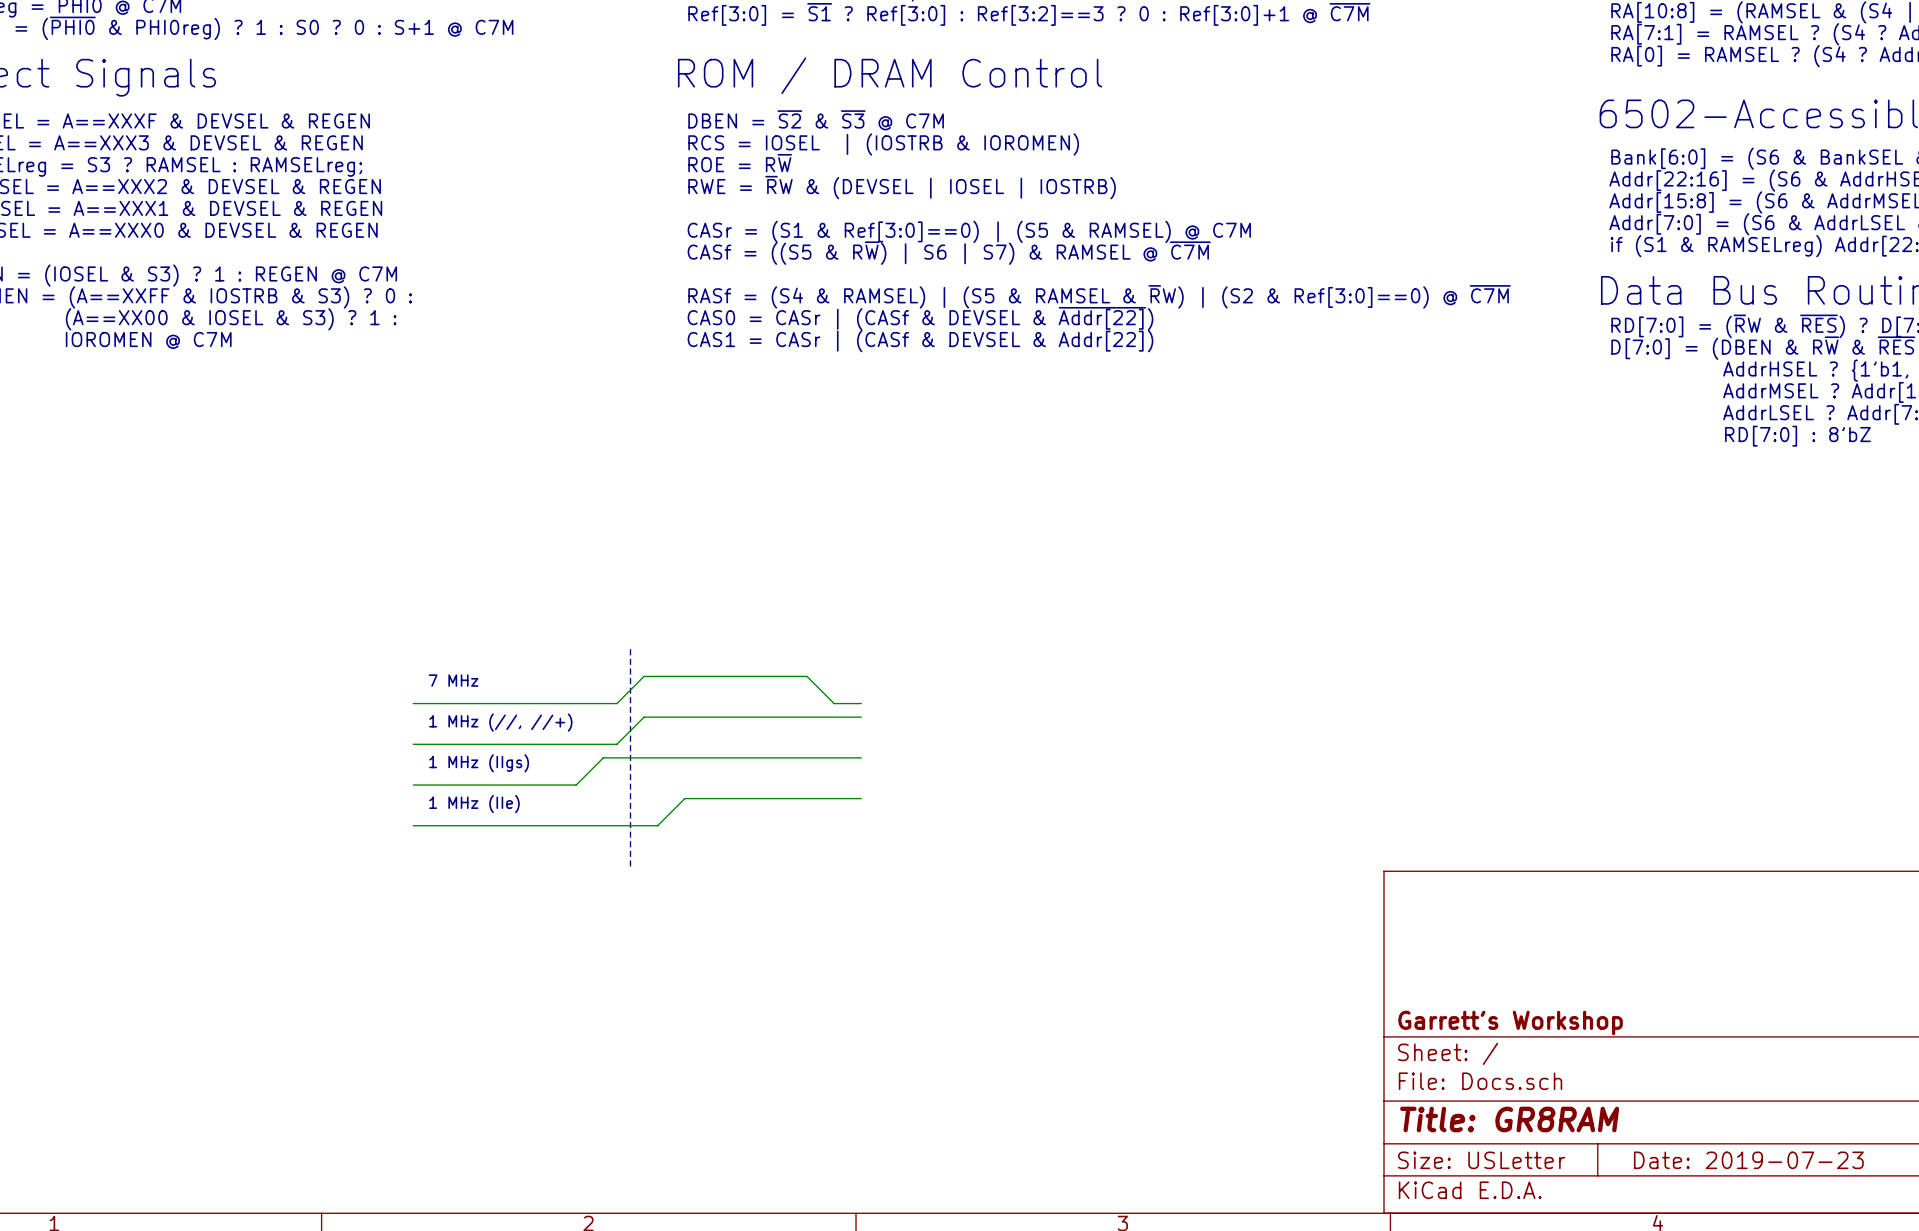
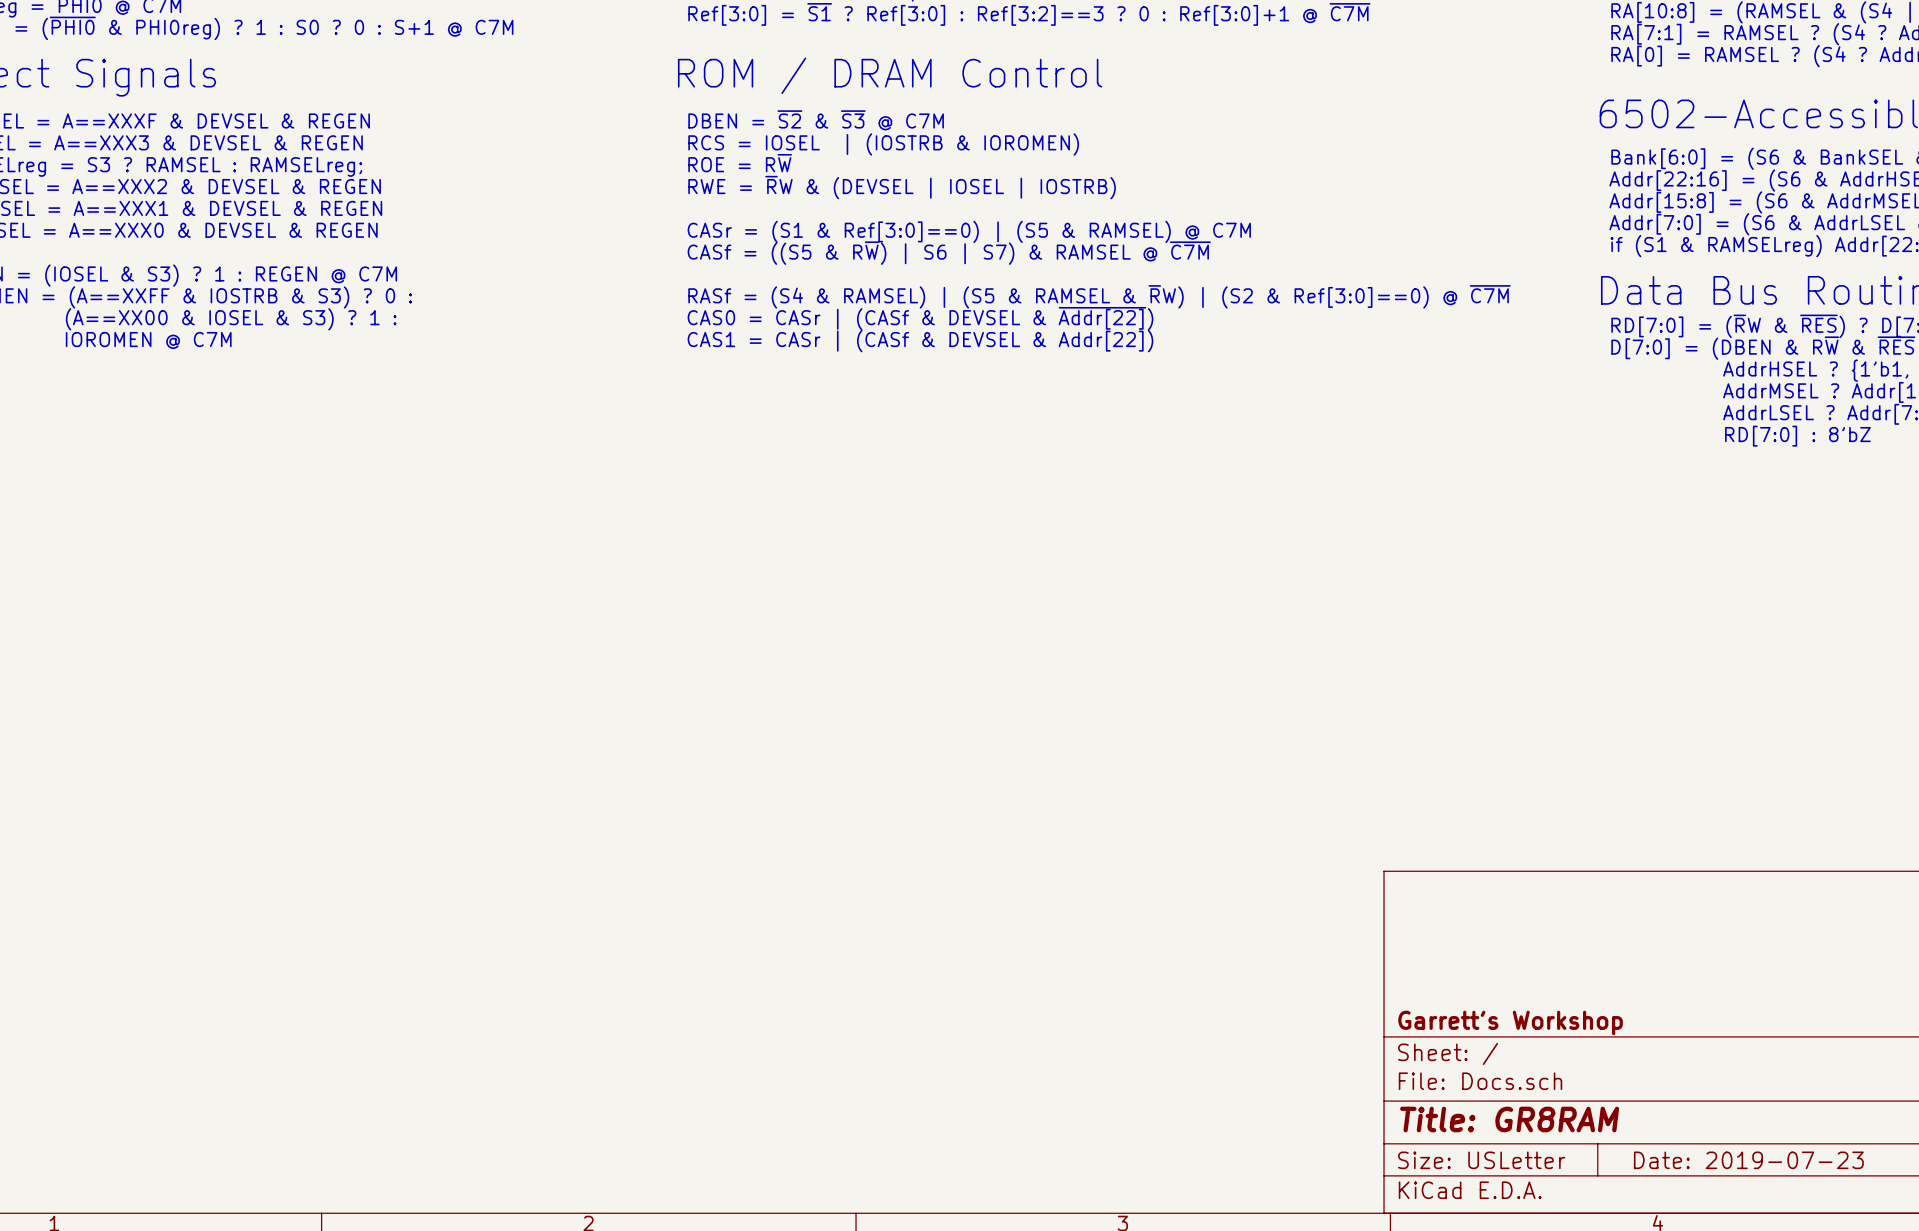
line: (630, 649) (630, 866) -> none
text: 7 MHz (453, 680) -> none
wire: (413, 703) (616, 703) (644, 676) (806, 676) (834, 703) (861, 703) -> none
wire: (861, 717) (644, 717) (616, 744) (413, 744) -> none
text: 1 MHz (//, //+) (500, 722) -> none
wire: (861, 757) (603, 757) (576, 785) (413, 785) -> none
text: 1 MHz (IIgs) (479, 763) -> none
wire: (861, 798) (684, 798) (657, 825) (413, 825) -> none
text: 1 MHz (IIe) (474, 804) -> none

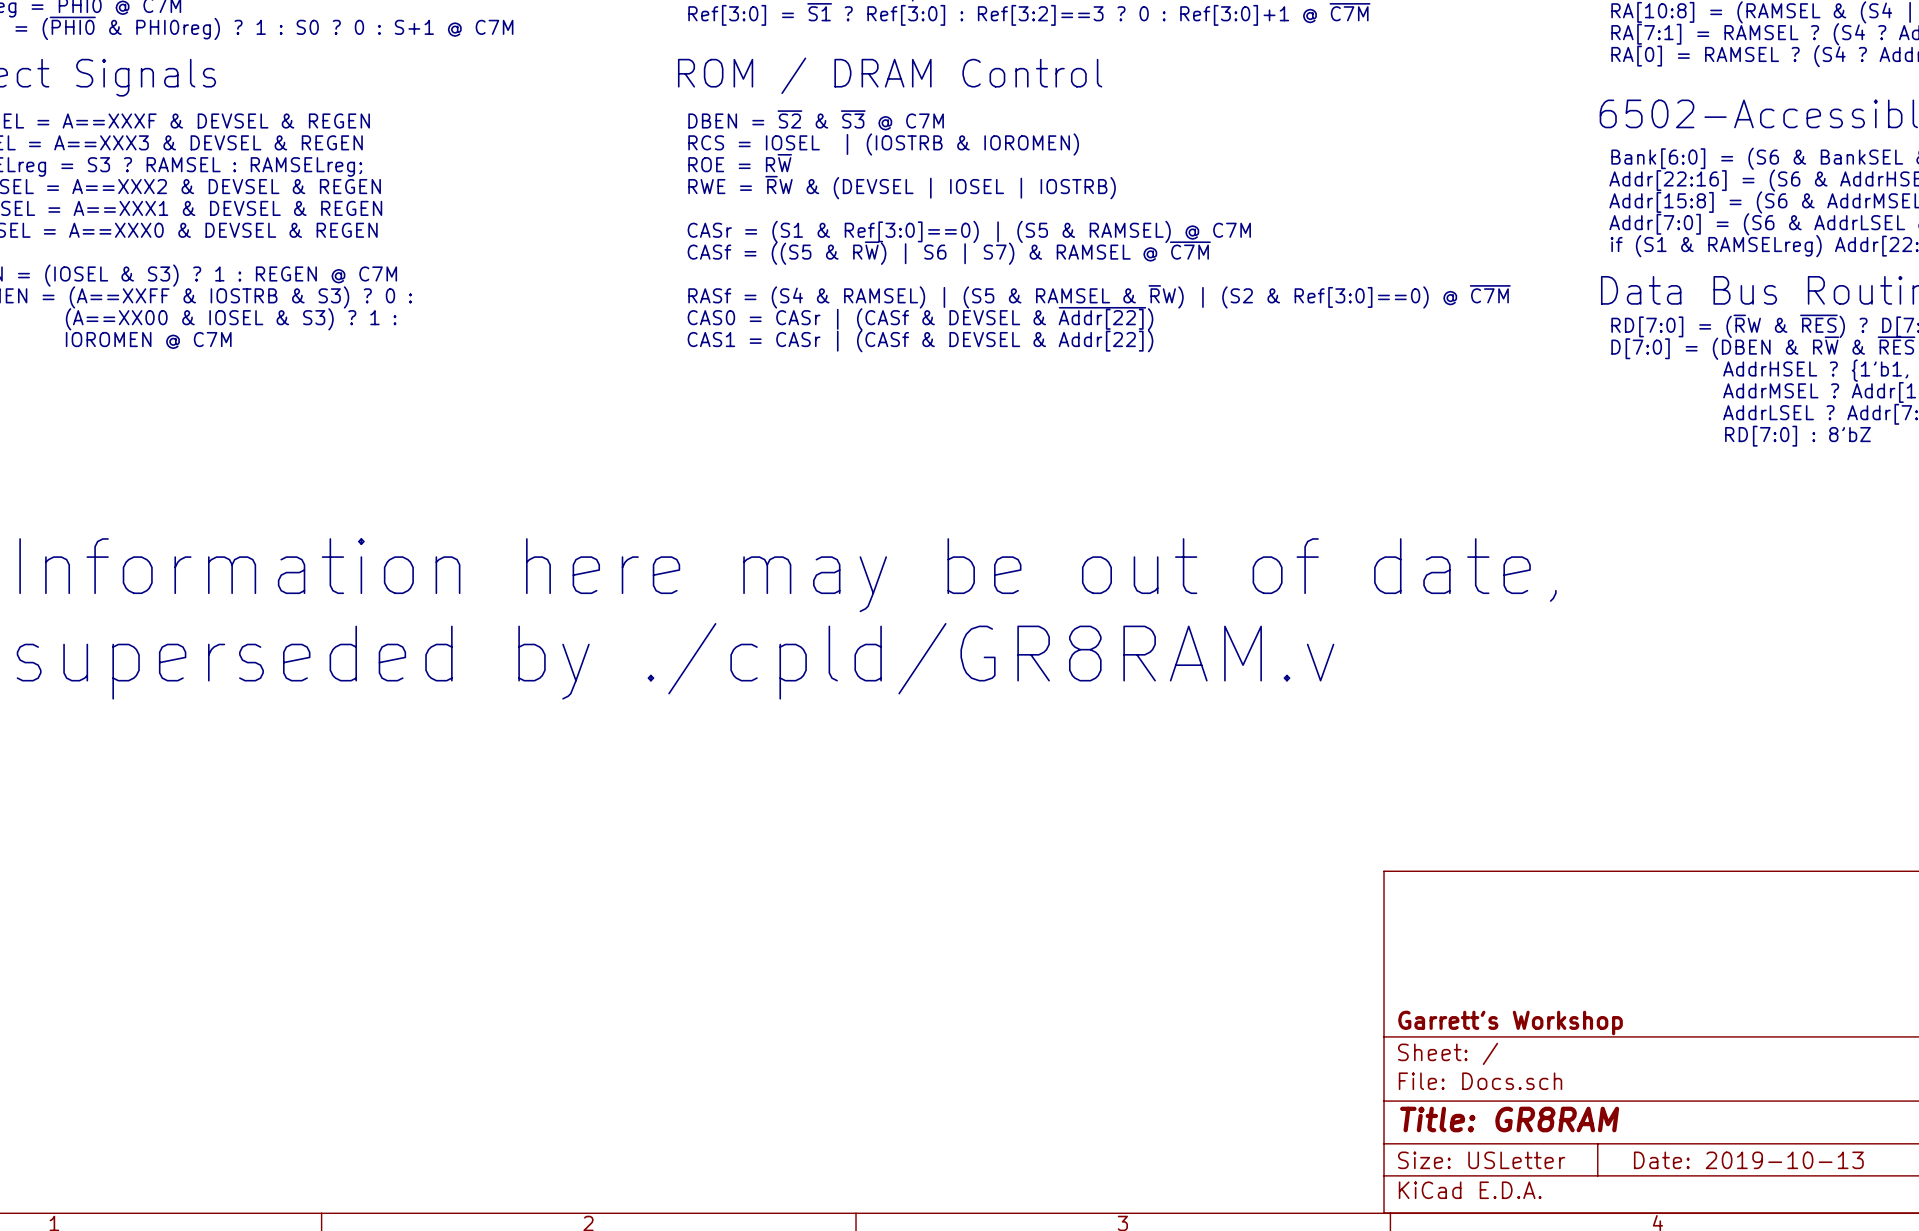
text: none -> Information here may be out of date, (787, 575)
text: none -> superseded by ./cpld/GR8RAM.v (675, 661)
title block: Date: 2019-07-23 (1748, 1160) -> Date: 2019-10-13 (1748, 1160)

